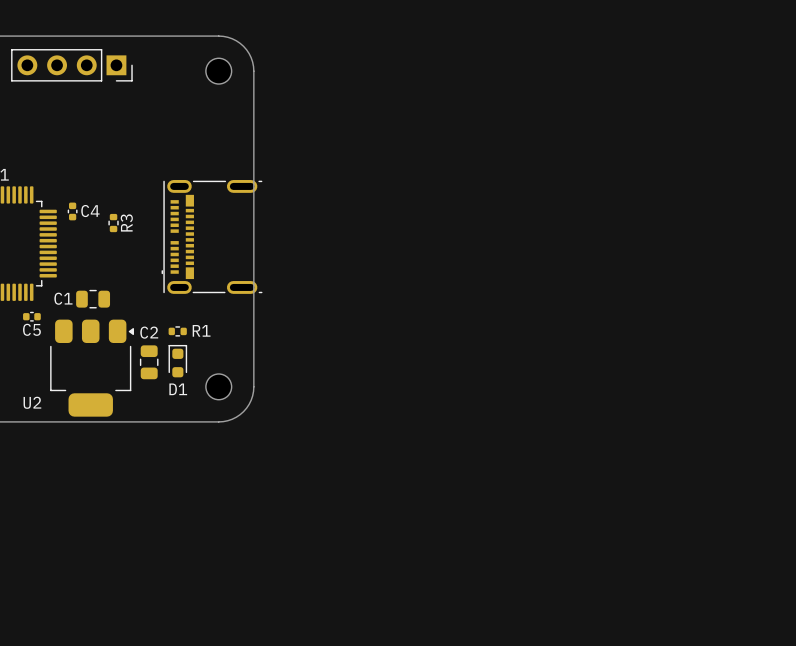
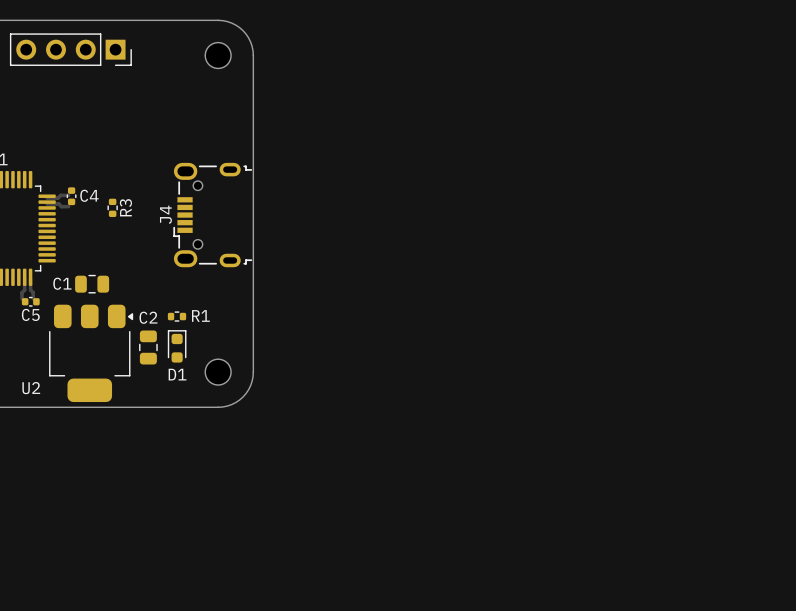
track: none -> (68, 195) (47, 198)
track: none -> (47, 204) (68, 206)
J4: none -> (212, 215)
part: (212, 236) -> none
track: none -> (24, 279) (21, 298)
track: none -> (30, 279) (33, 298)

